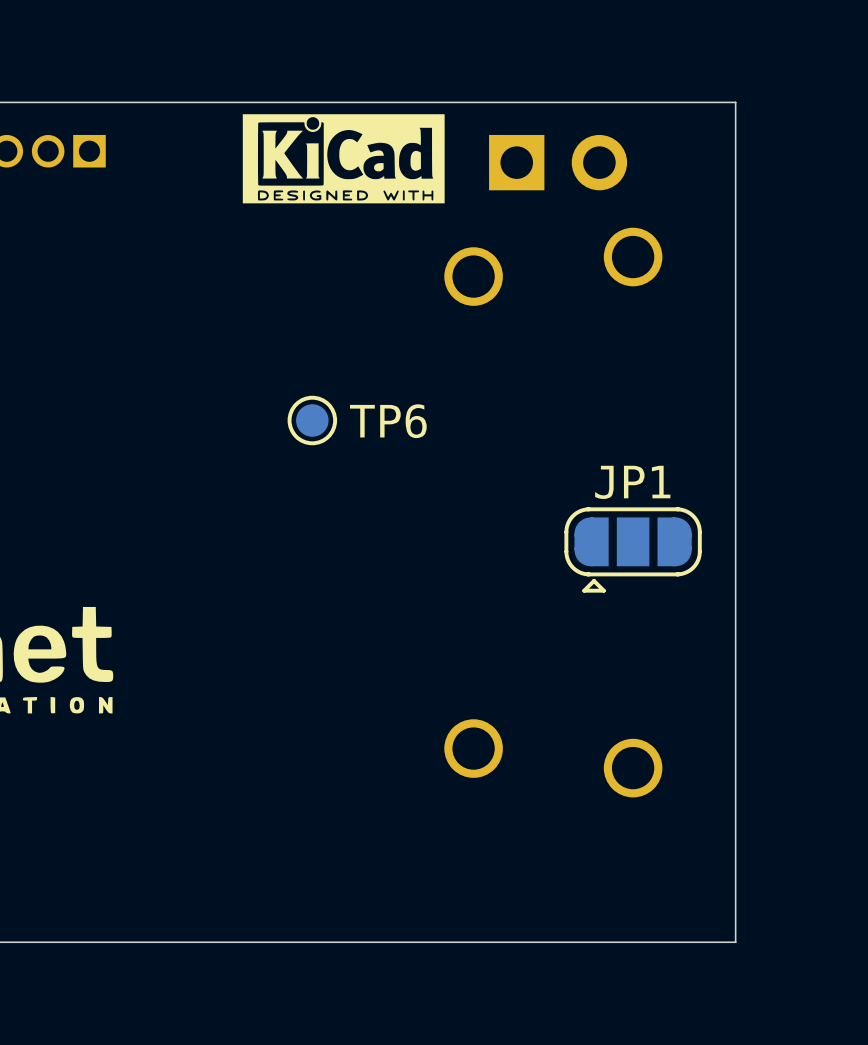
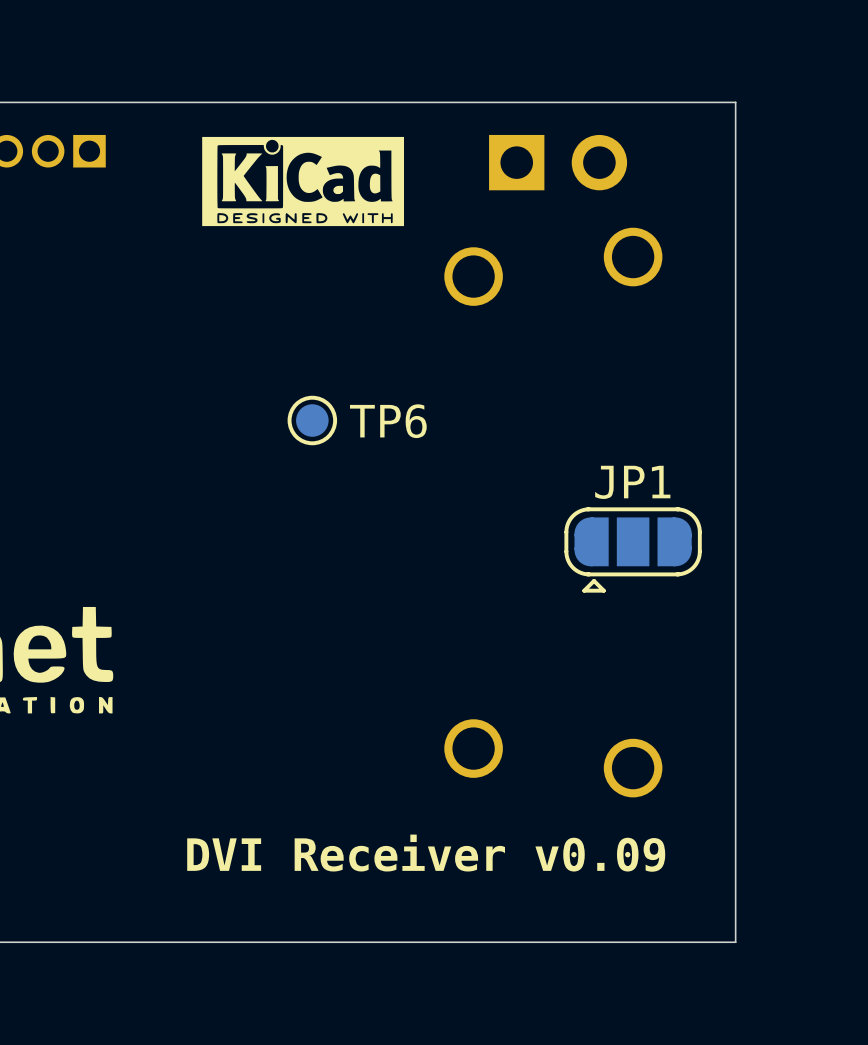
drawing position: (343, 158) -> (303, 181)
text: none -> DVI Receiver v0.09 (426, 853)

